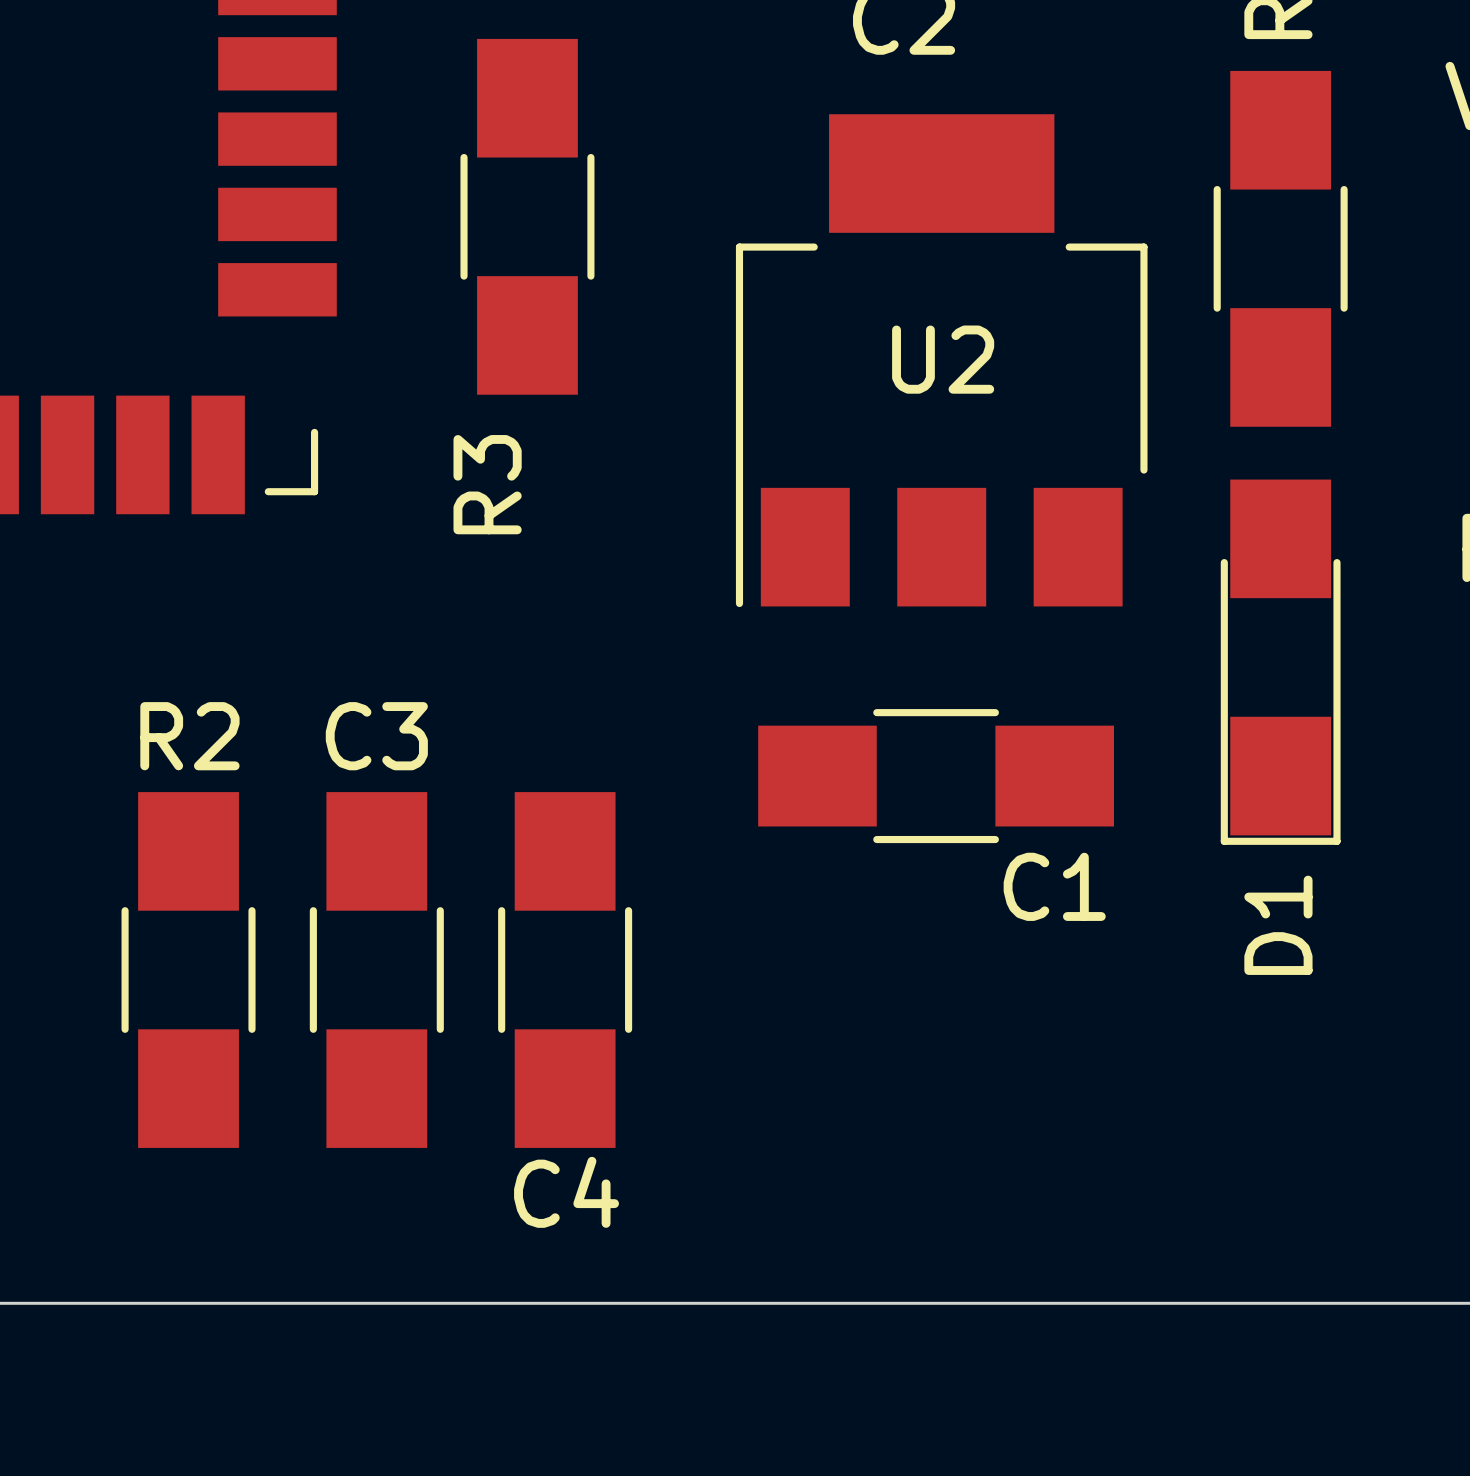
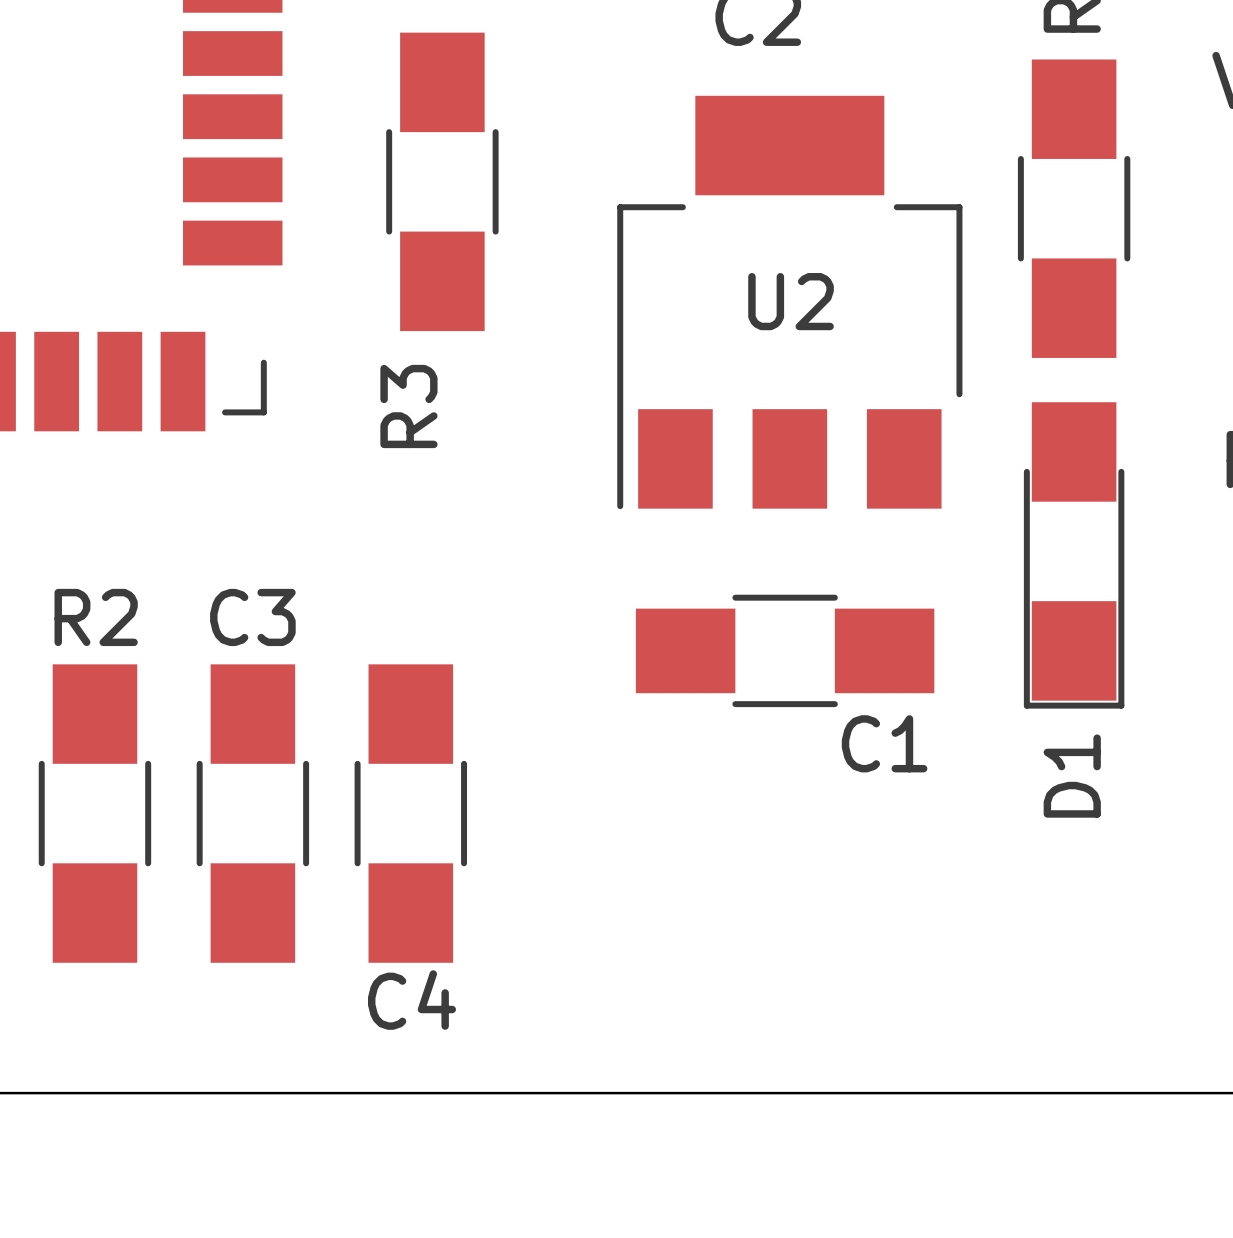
R2 position: (188, 970) -> (94, 813)
C3 position: (376, 970) -> (252, 813)
C4 position: (565, 970) -> (410, 813)

